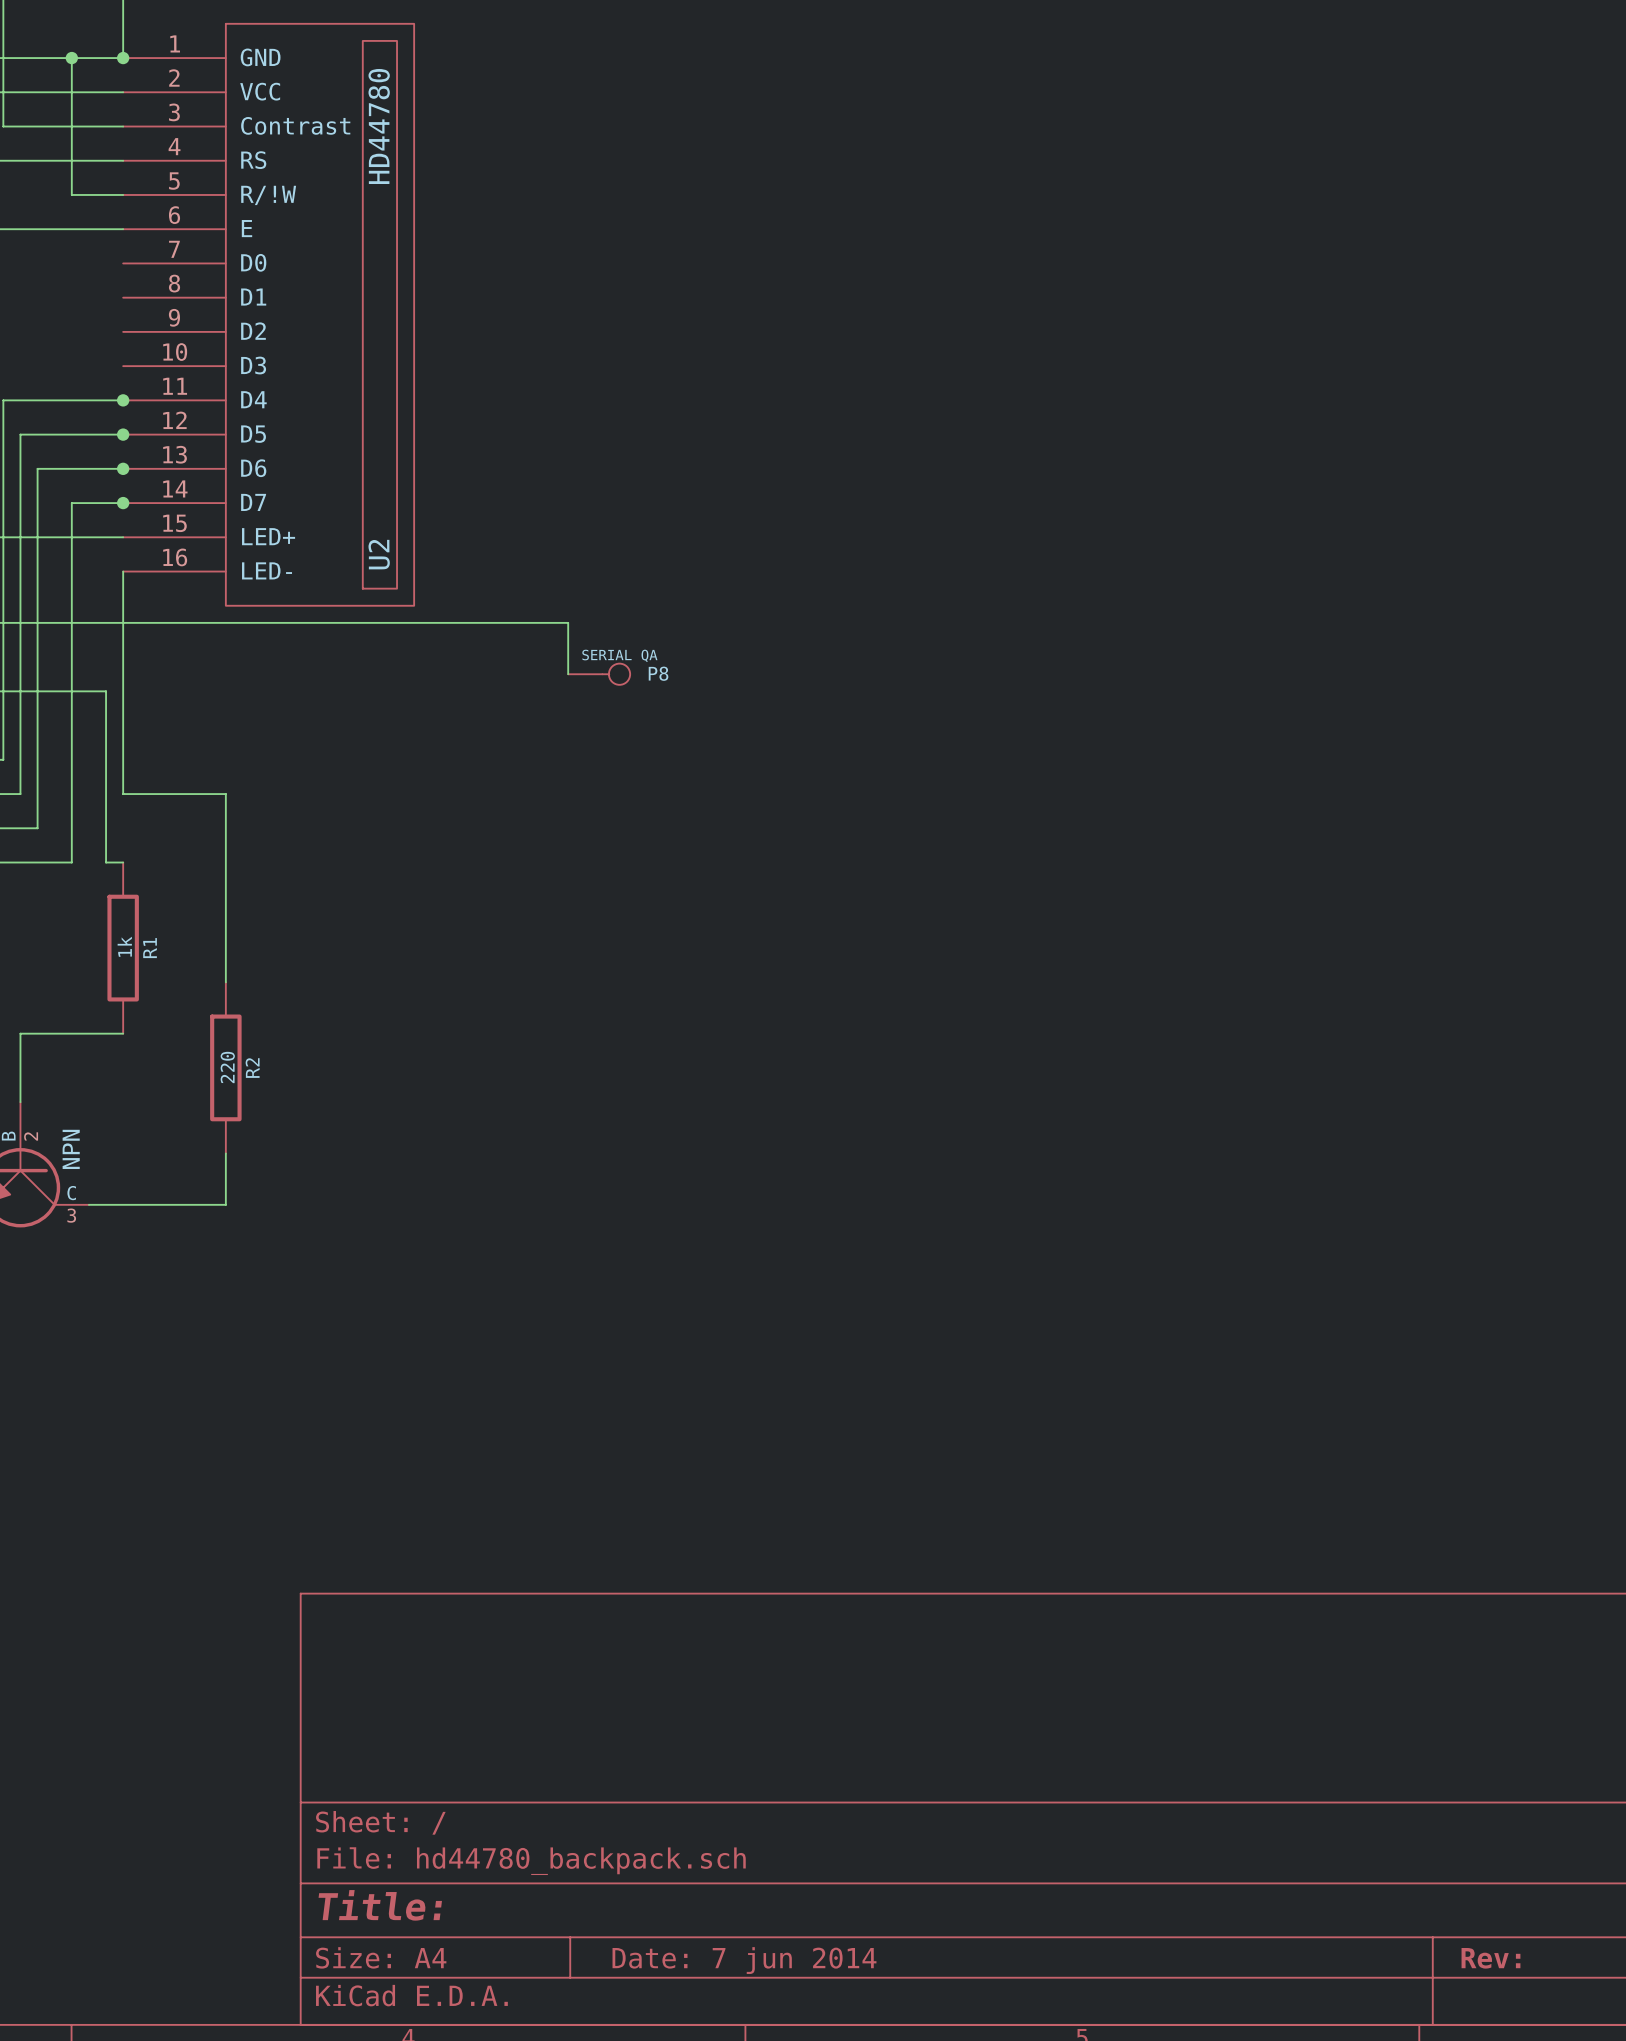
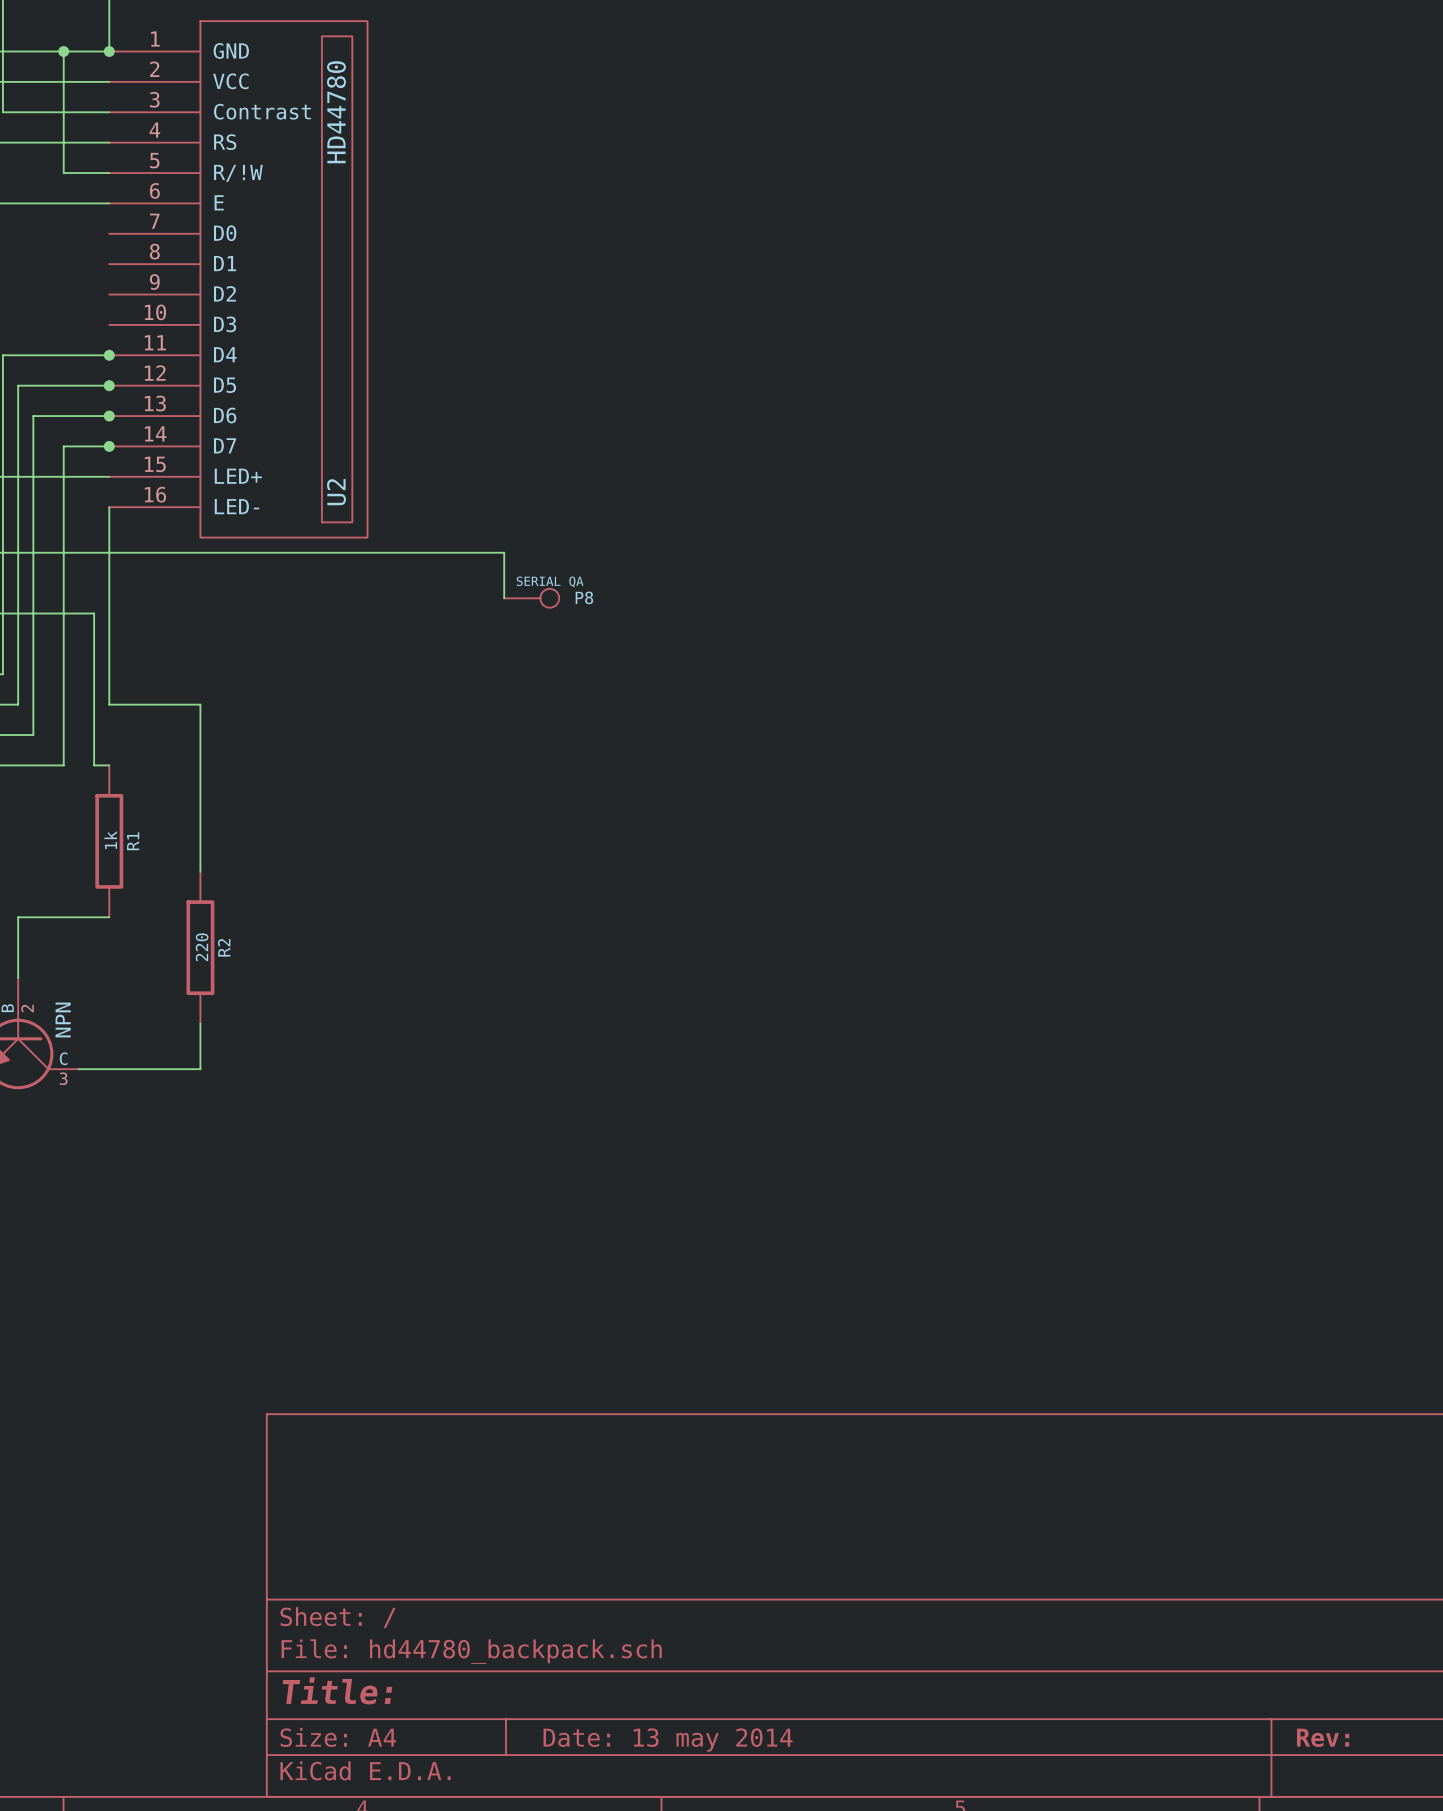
title block: Date: 7 jun 2014 (744, 1960) -> Date: 13 may 2014 (668, 1740)

